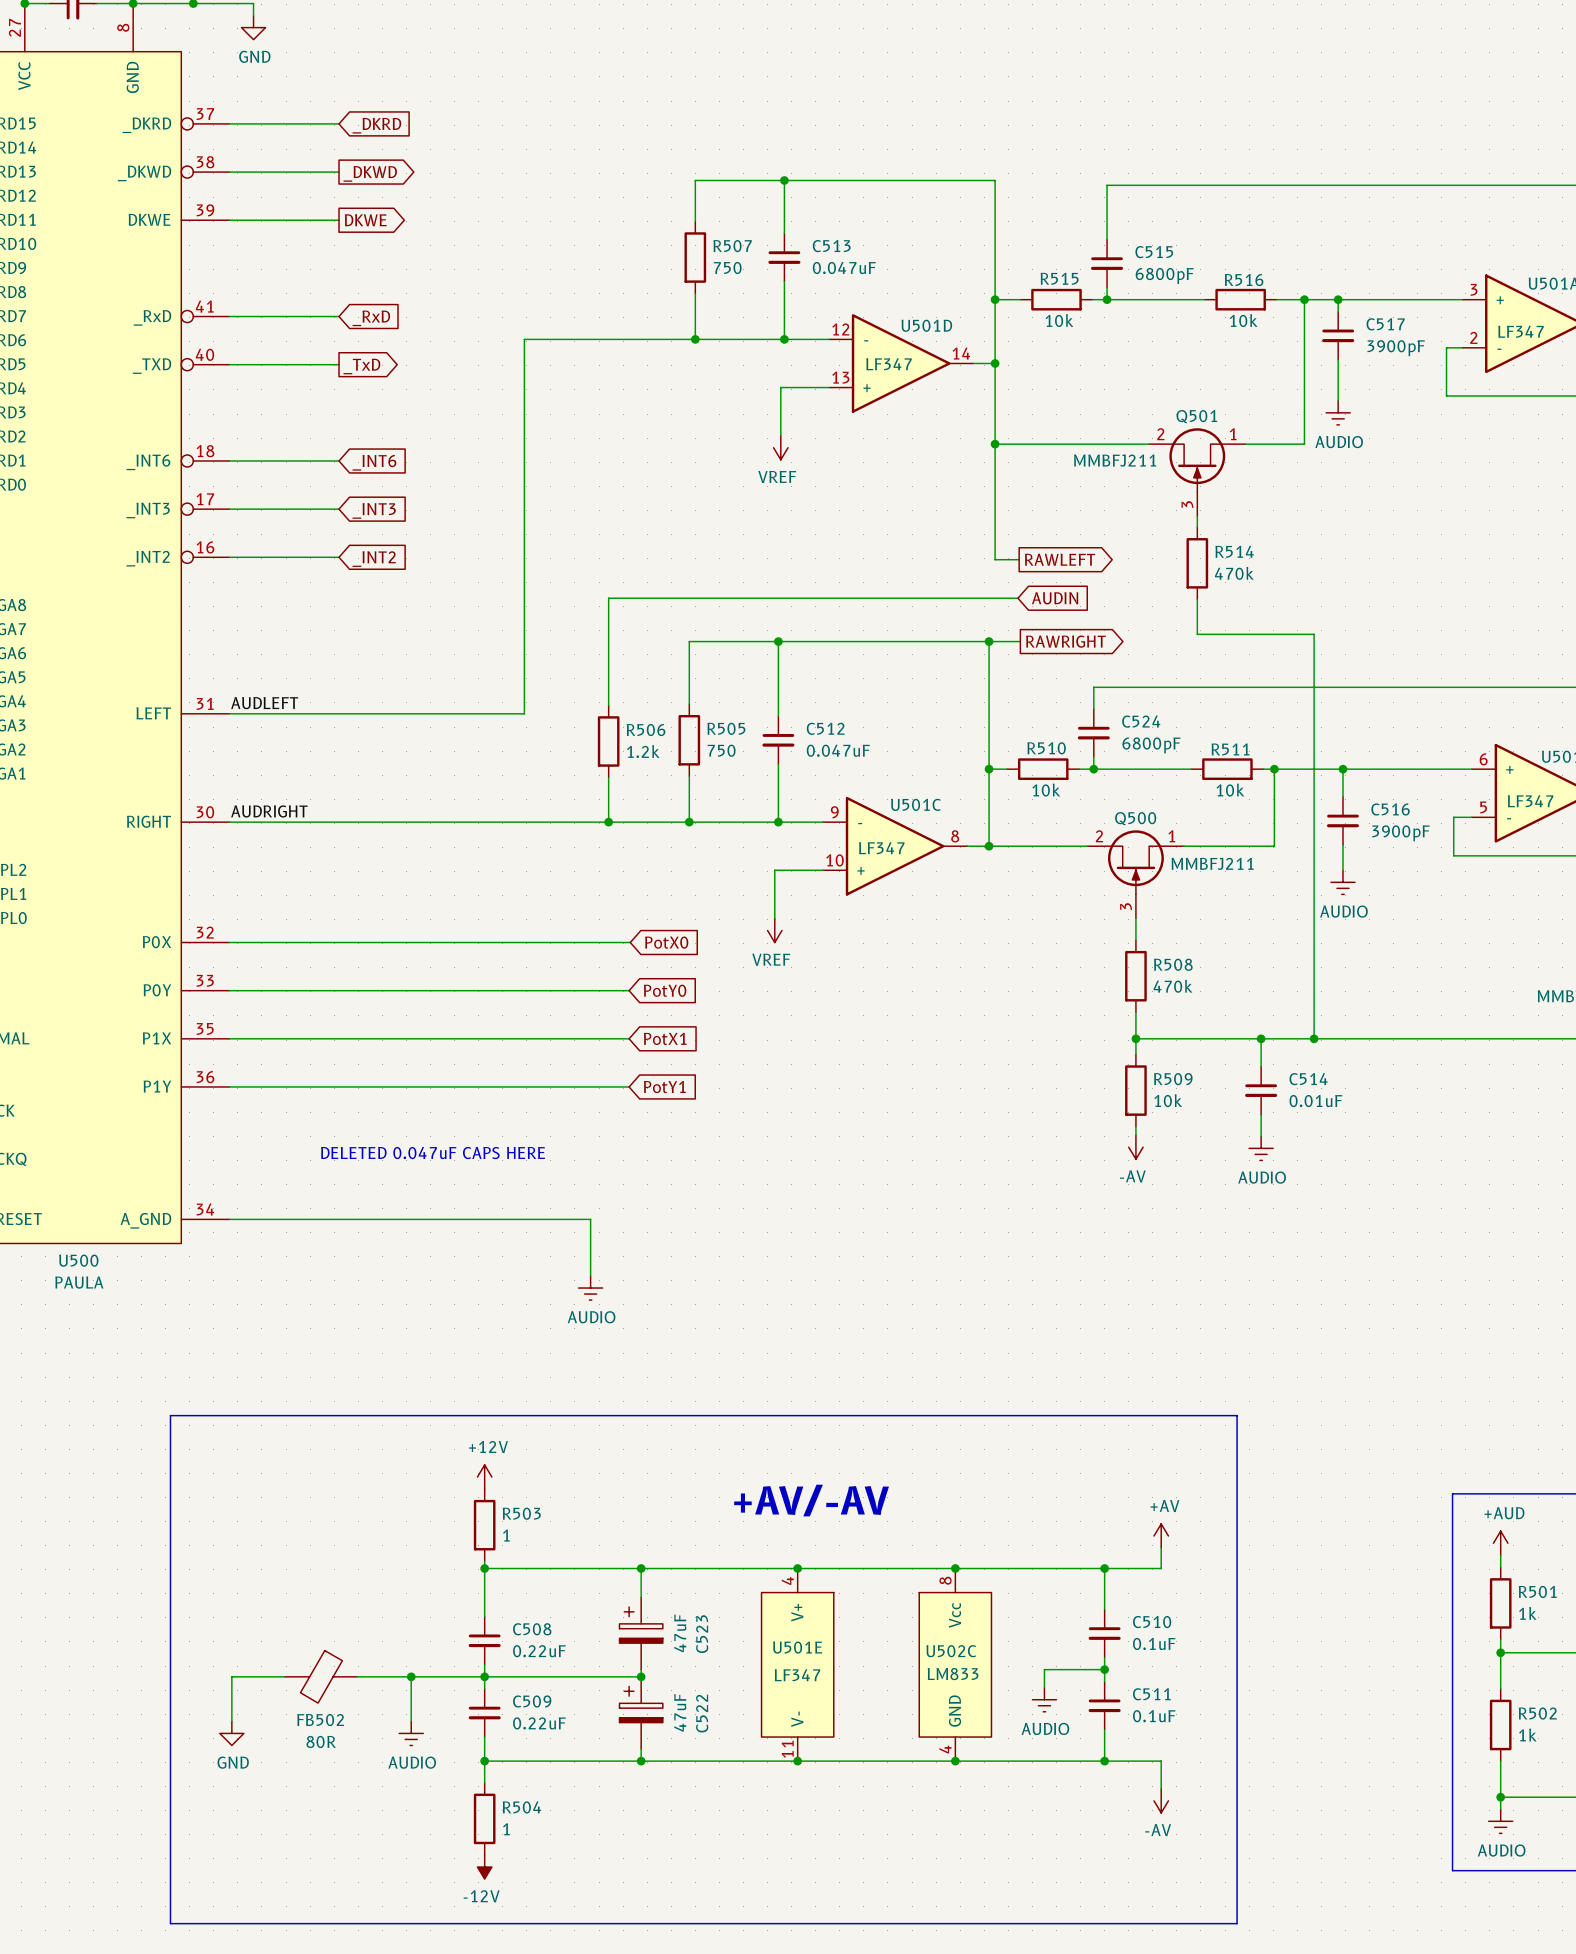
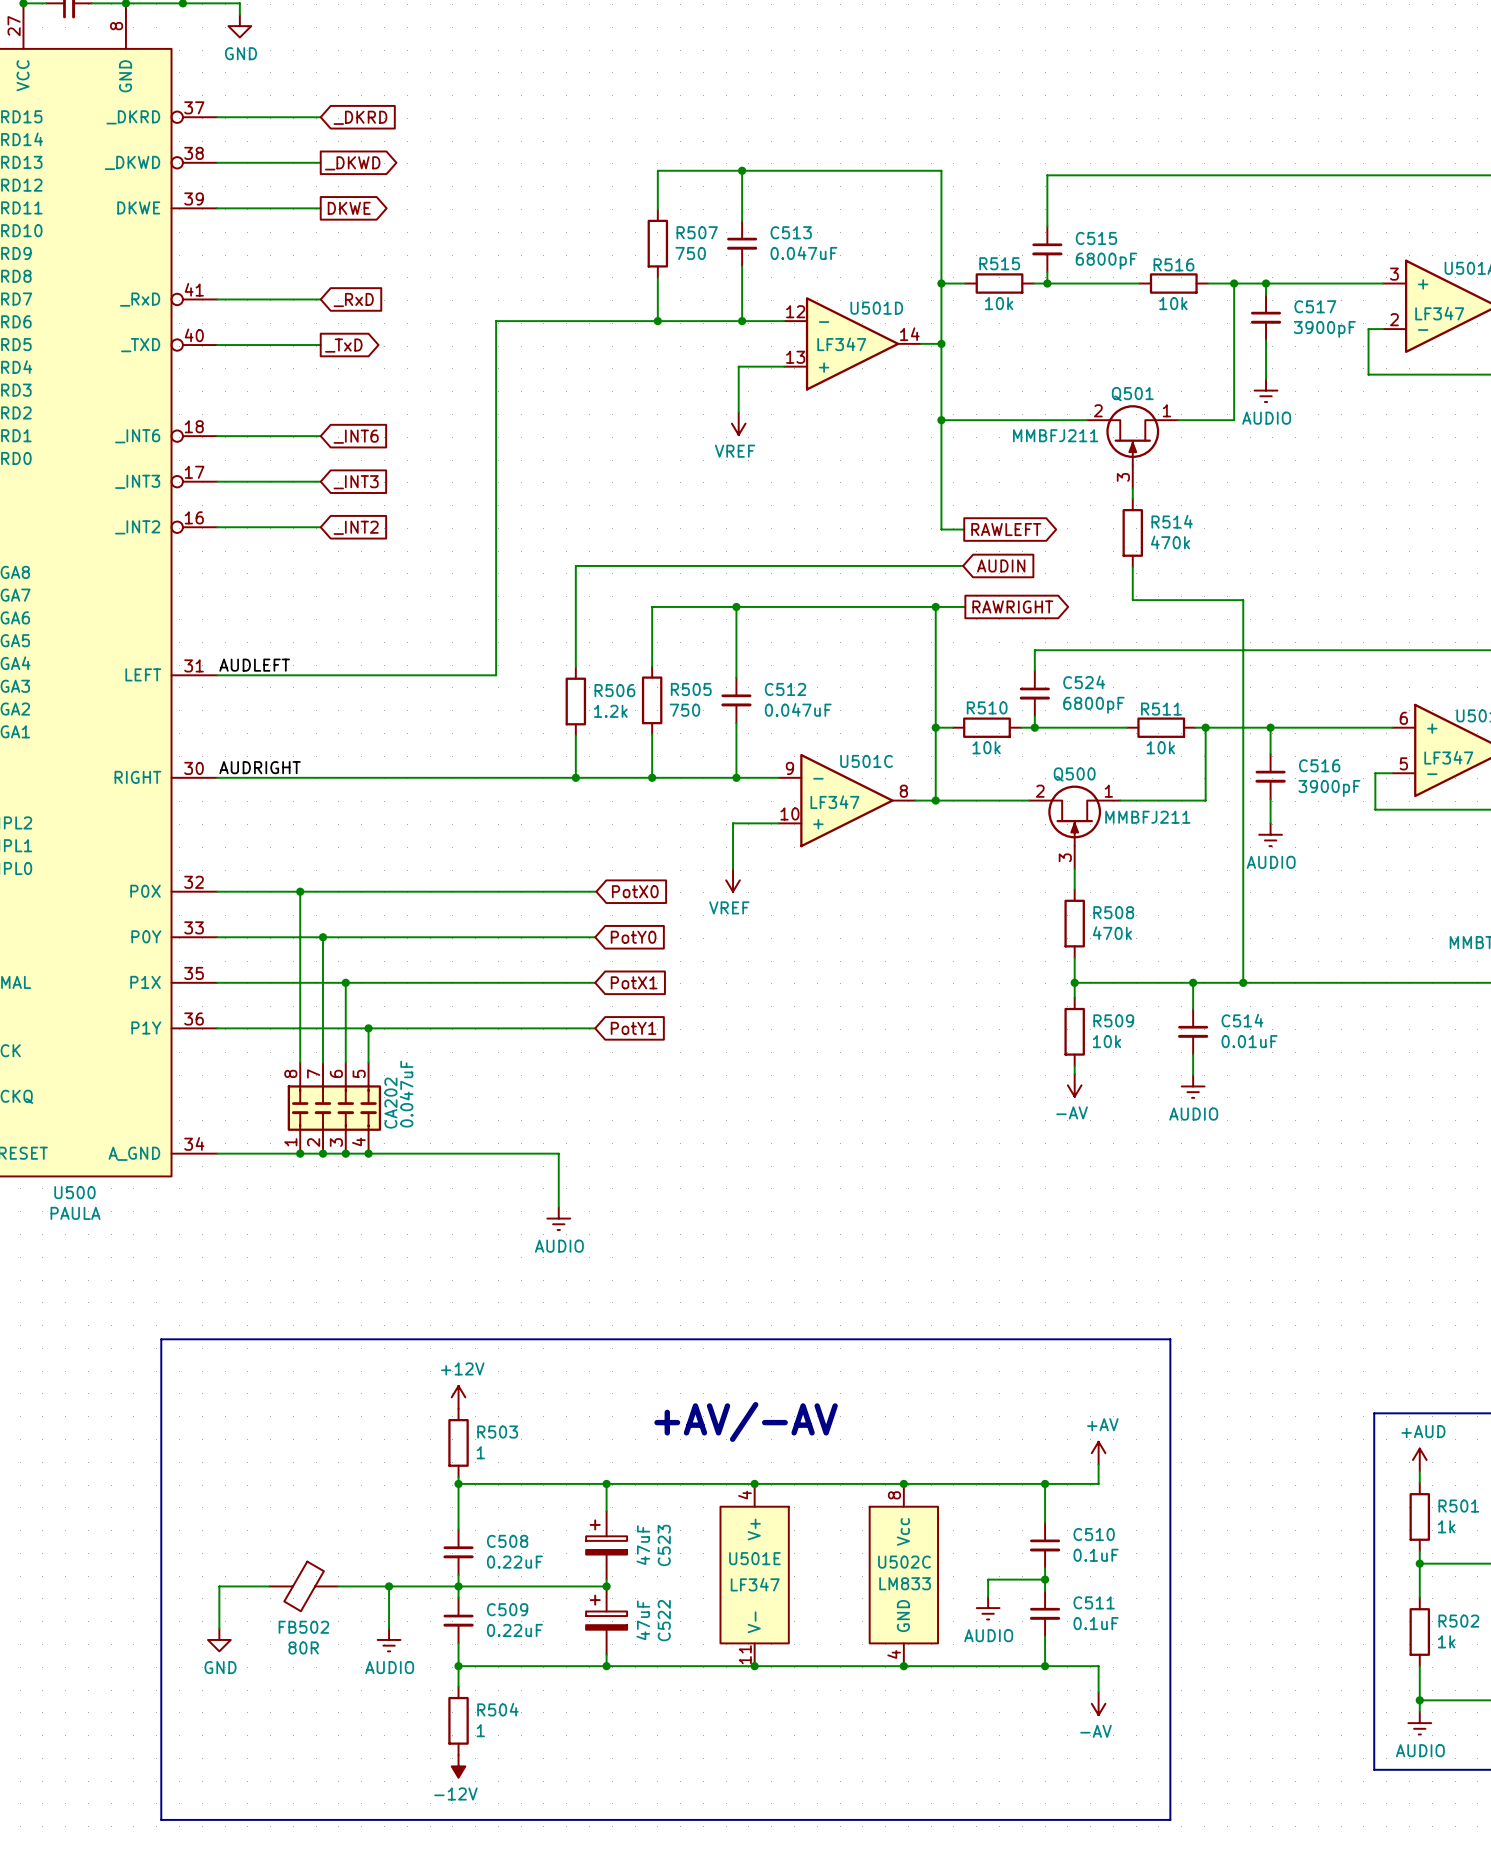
wire: none -> (300, 891) (300, 1062)
junction: none -> (300, 891)
wire: none -> (323, 937) (323, 1062)
junction: none -> (323, 937)
wire: none -> (345, 982) (345, 1062)
junction: none -> (345, 982)
wire: none -> (368, 1028) (368, 1062)
junction: none -> (368, 1028)
text: DELETED 0.047uF CAPS HERE (433, 1153) -> none
CA202: none -> 0.047uF (334, 1108)
junction: none -> (300, 1153)
junction: none -> (323, 1153)
junction: none -> (345, 1153)
junction: none -> (368, 1153)

